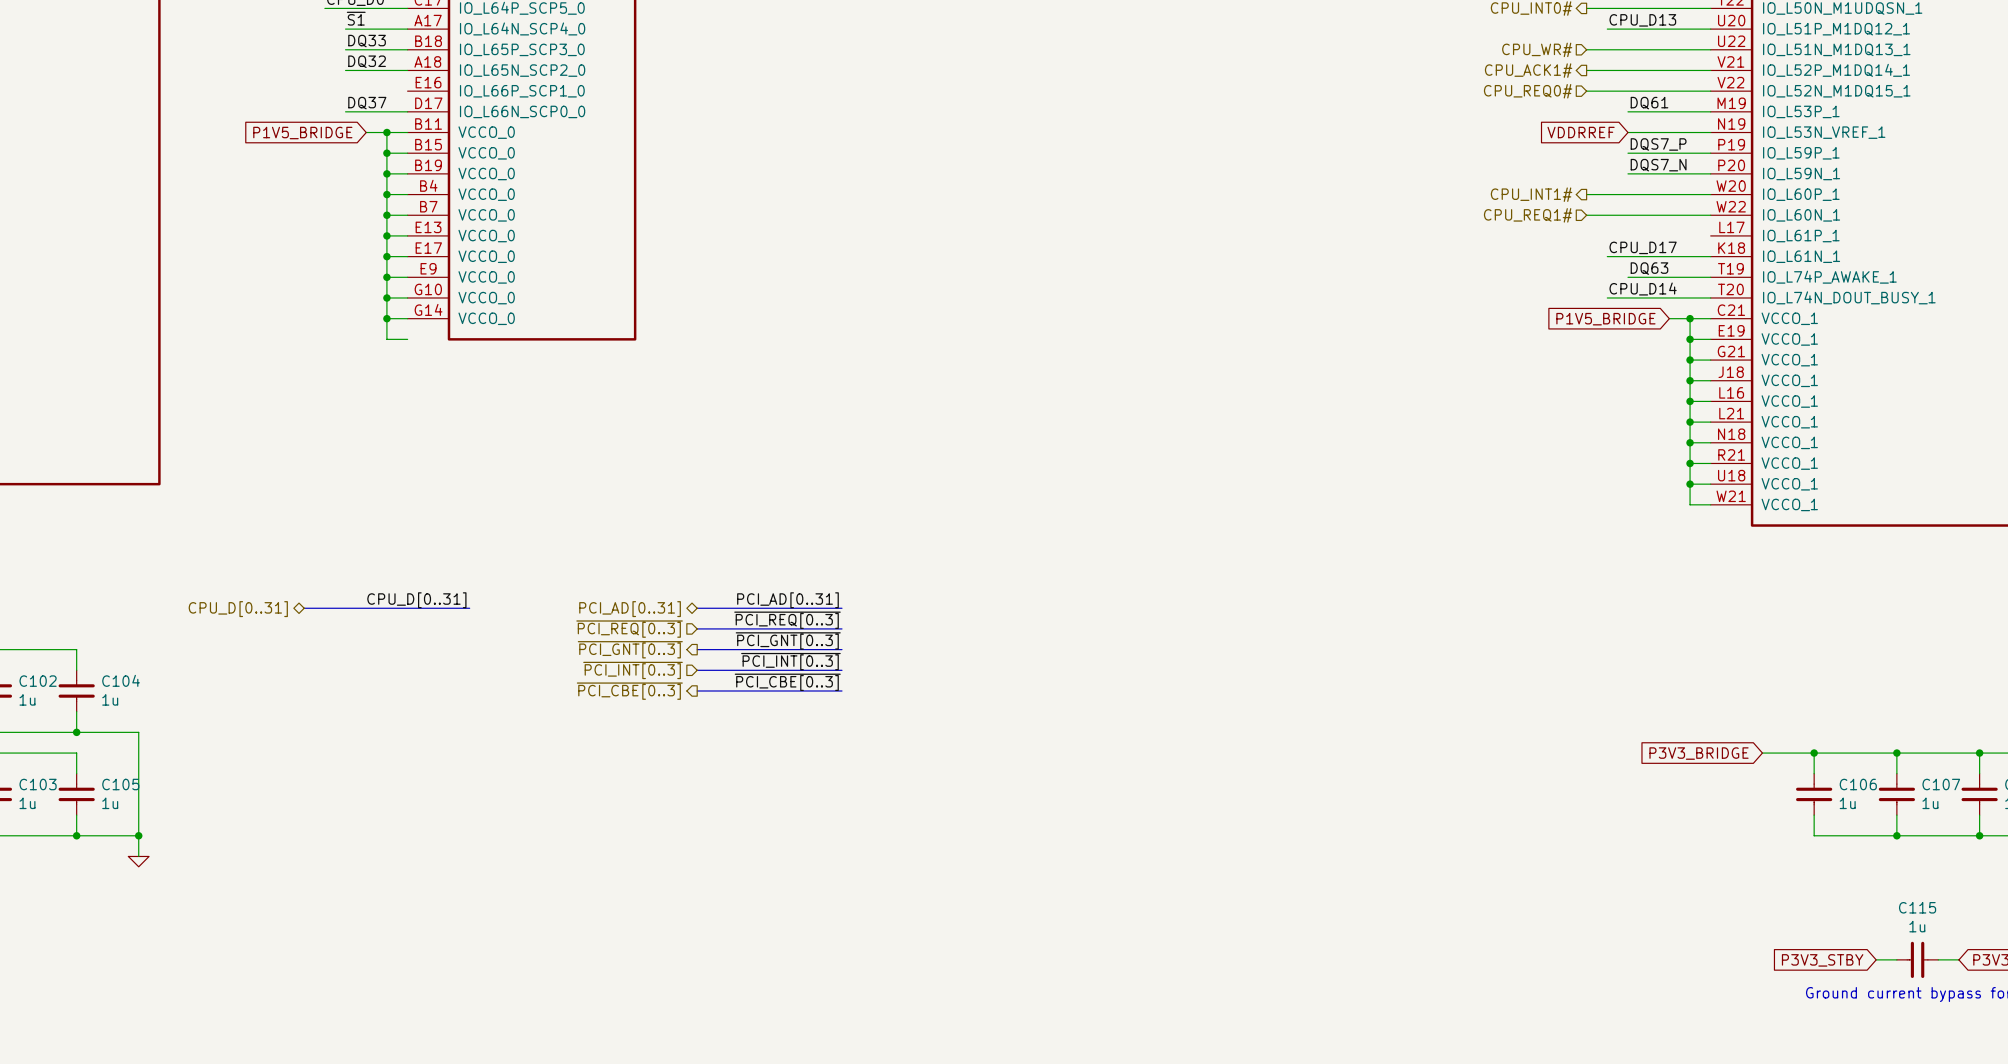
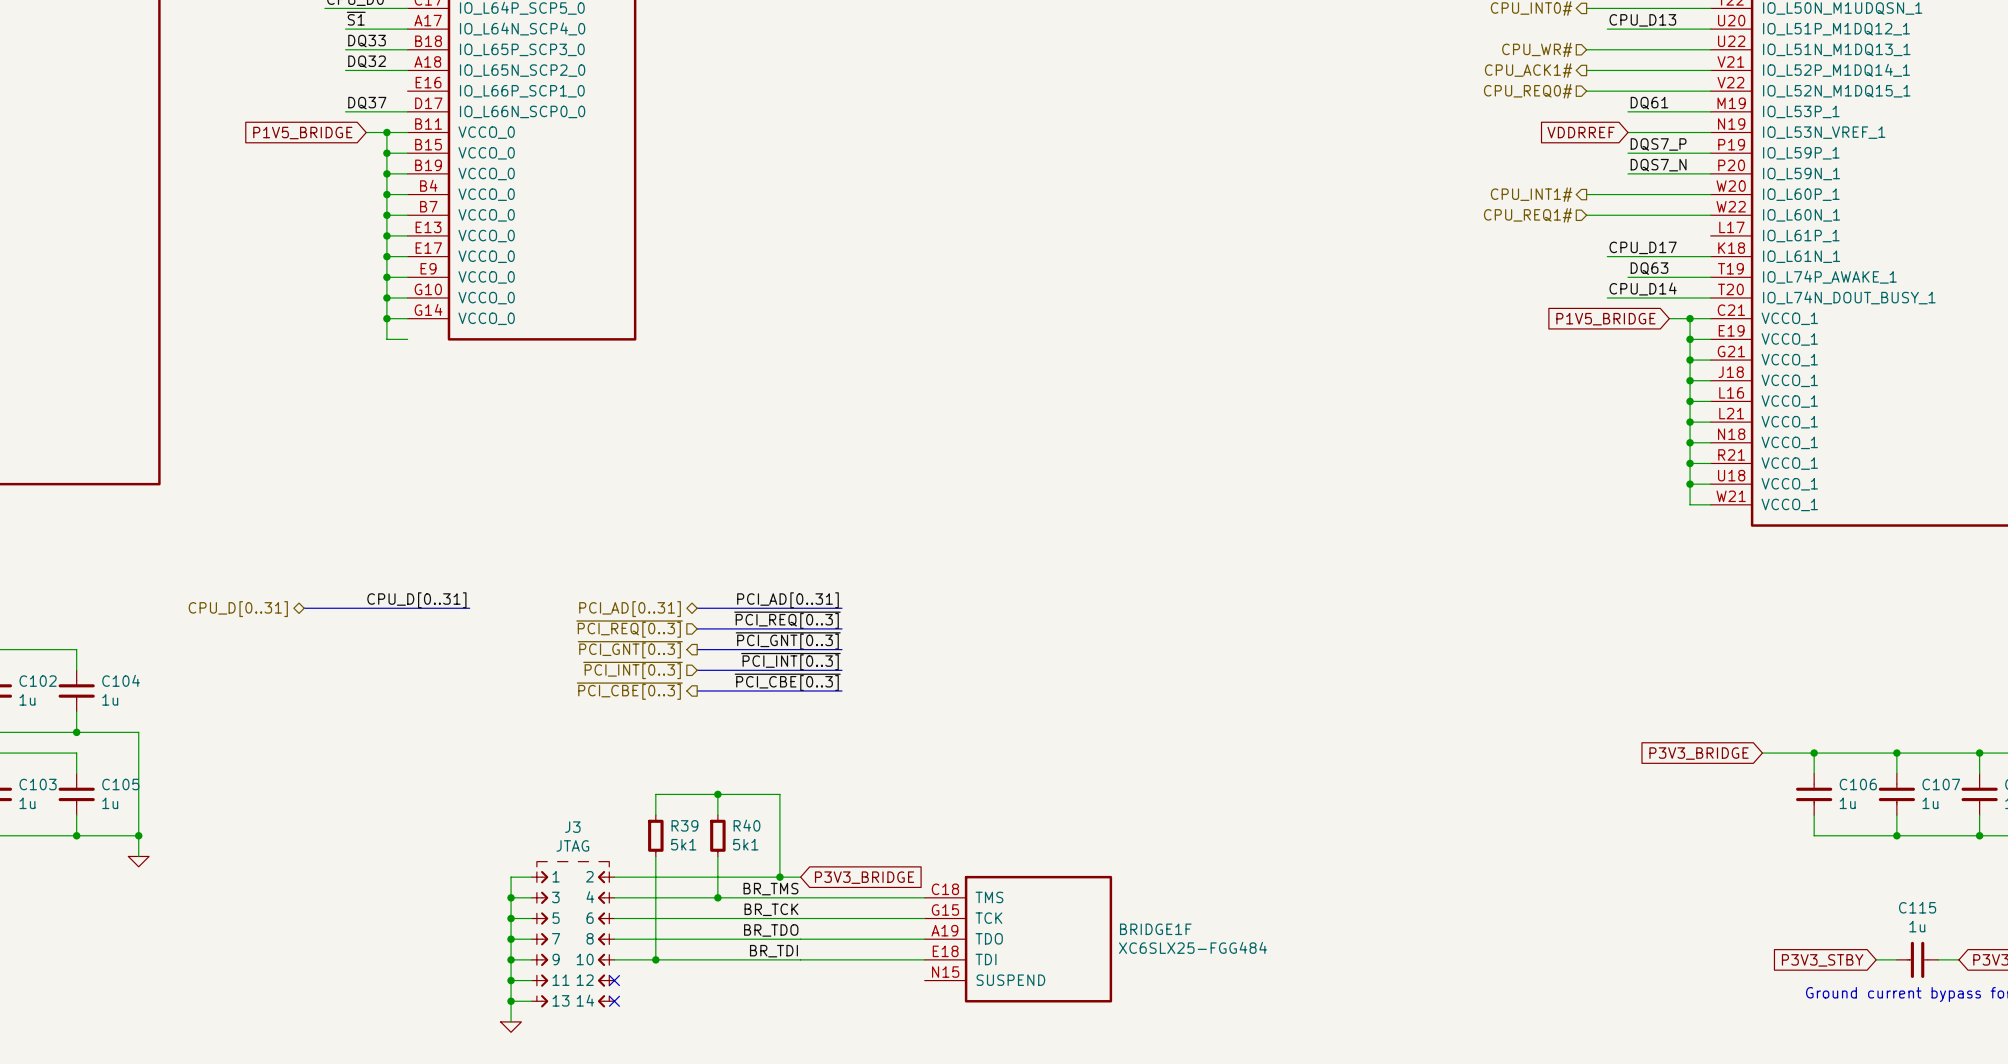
wire: none -> (717, 794) (717, 815)
junction: none -> (717, 794)
wire: none -> (655, 815) (655, 794) (779, 794) (779, 877)
R39: none -> 5k1 (655, 835)
R40: none -> 5k1 (717, 835)
wire: none -> (655, 856) (655, 959)
wire: none -> (717, 856) (717, 897)
wire: none -> (531, 877) (511, 877) (511, 1021)
wire: none -> (614, 877) (800, 877)
junction: none -> (779, 877)
global label: none -> P3V3_BRIDGE (864, 877)
label: none -> BR_TMS (770, 889)
wire: none -> (511, 897) (531, 897)
junction: none -> (511, 897)
wire: none -> (614, 897) (924, 897)
junction: none -> (717, 897)
label: none -> BR_TCK (771, 909)
wire: none -> (511, 918) (531, 918)
junction: none -> (511, 918)
wire: none -> (614, 918) (924, 918)
label: none -> BR_TDO (771, 930)
J3: none -> JTAG (573, 934)
wire: none -> (511, 939) (531, 939)
junction: none -> (511, 939)
wire: none -> (614, 939) (924, 939)
BRIDGE1F: none -> XC6SLX25-FGG484 (1018, 939)
label: none -> BR_TDI (773, 951)
wire: none -> (511, 959) (531, 959)
junction: none -> (511, 959)
wire: none -> (614, 959) (924, 959)
junction: none -> (655, 959)
wire: none -> (511, 980) (531, 980)
junction: none -> (511, 980)
no-connect mark: none -> (614, 980)
wire: none -> (511, 1001) (531, 1001)
junction: none -> (511, 1001)
no-connect mark: none -> (614, 1001)
power symbol: none -> (511, 1027)

